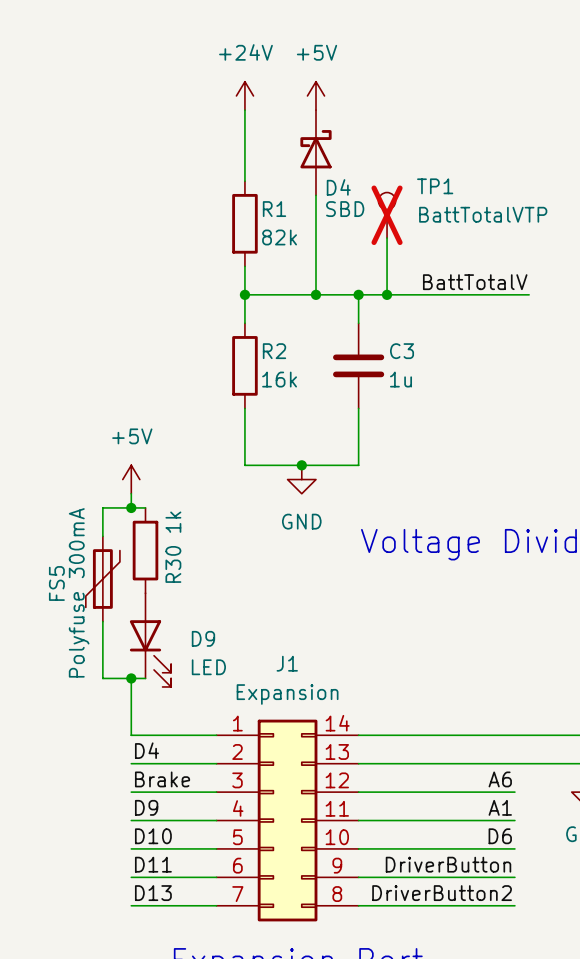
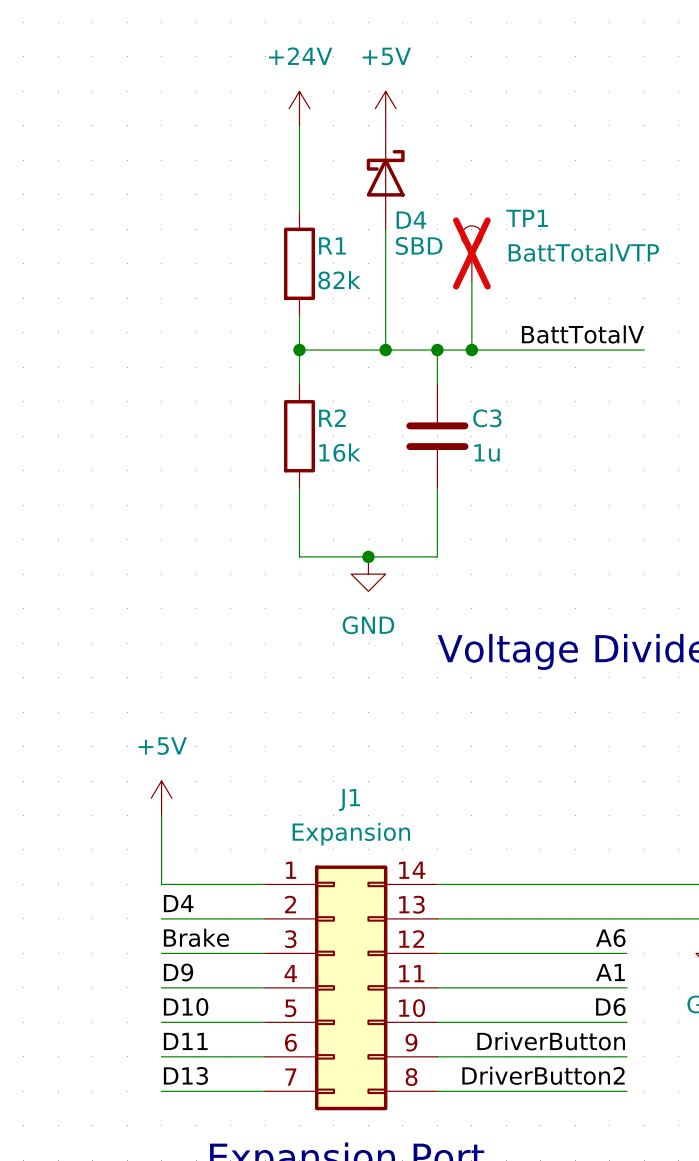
power symbol position: +5V (131, 479) -> +5V (161, 798)
wire: (131, 493) (131, 507) -> none
junction: (131, 507) -> none
wire: (145, 507) (102, 507) (102, 536) -> none
R30: 1k (145, 550) -> none
FS5: Polyfuse 300mA (102, 579) -> none
wire: (102, 621) (102, 678) (145, 678) -> none
D9: LED (150, 640) -> none
junction: (131, 678) -> none

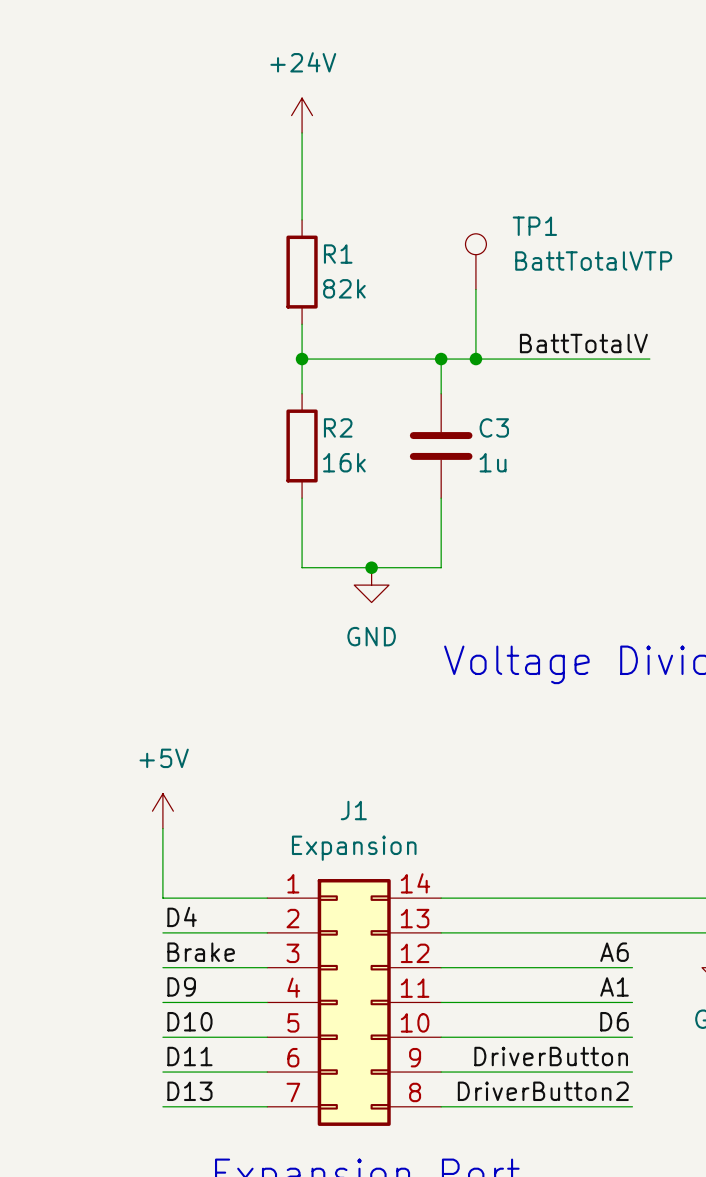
power symbol: +5V (385, 108) -> none
D4: SBD (385, 177) -> none
wire: (385, 229) (385, 350) -> none
TP1 do-not-place cross: (471, 253) -> none
junction: (385, 350) -> none

